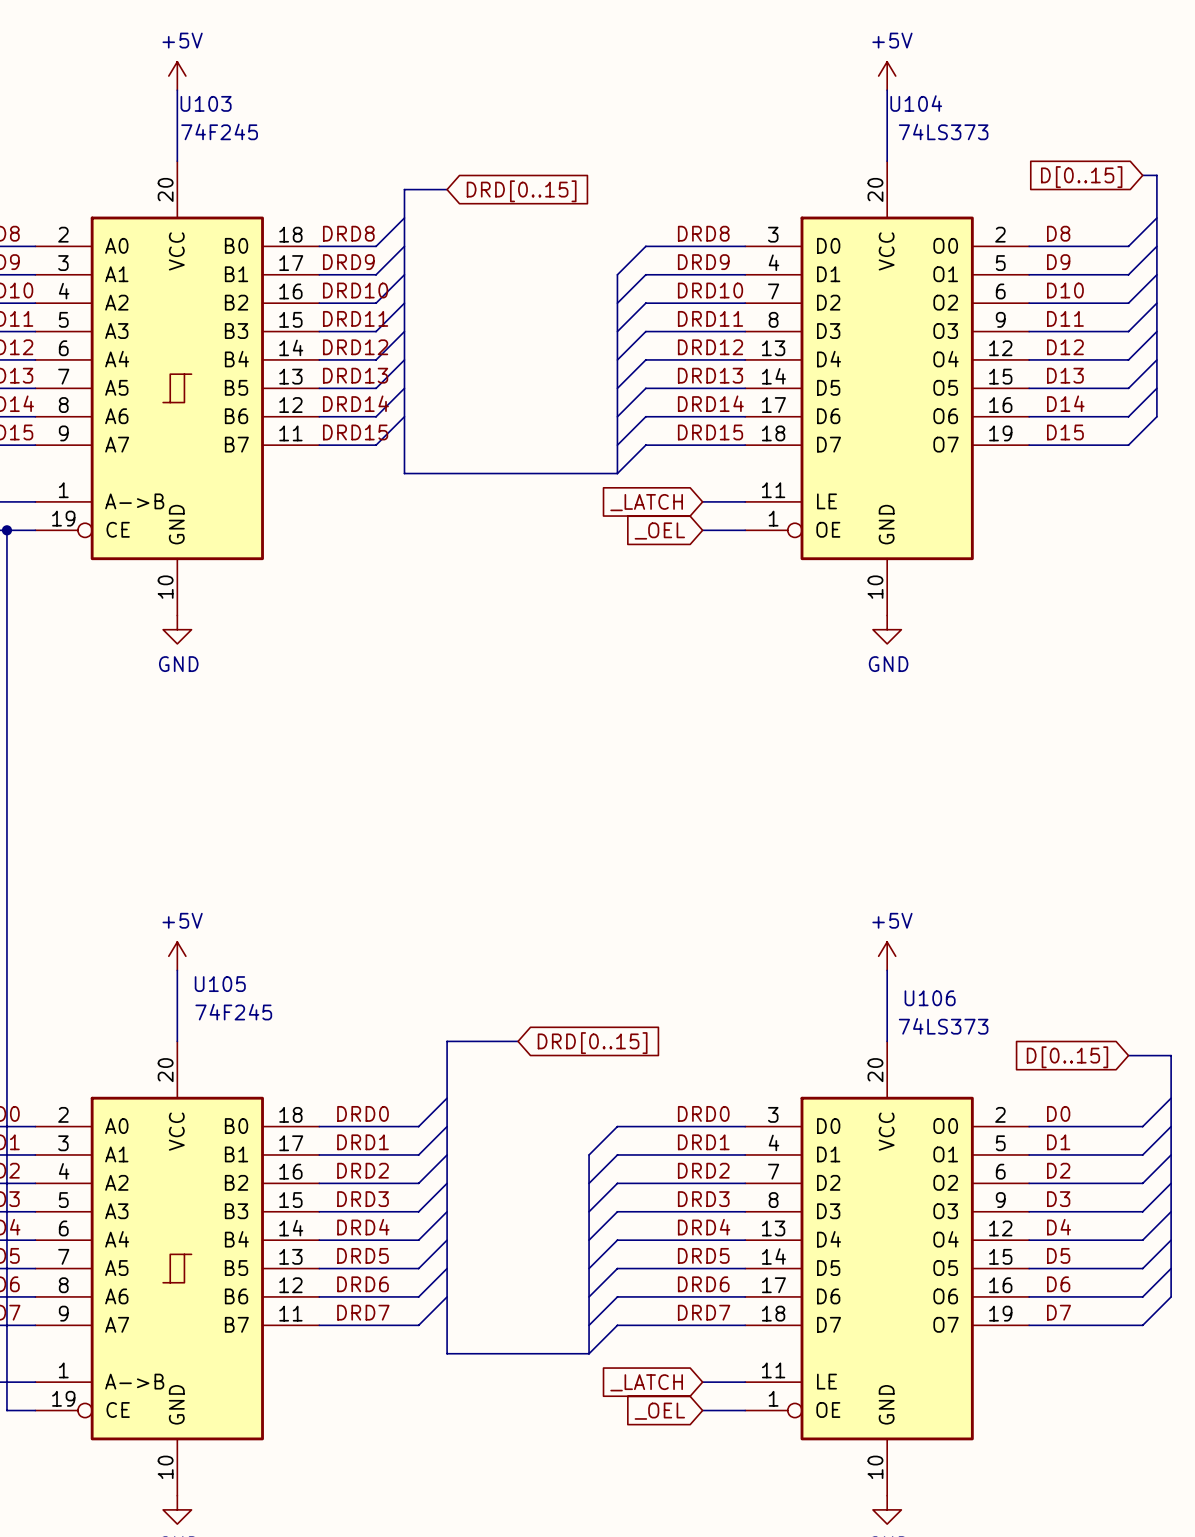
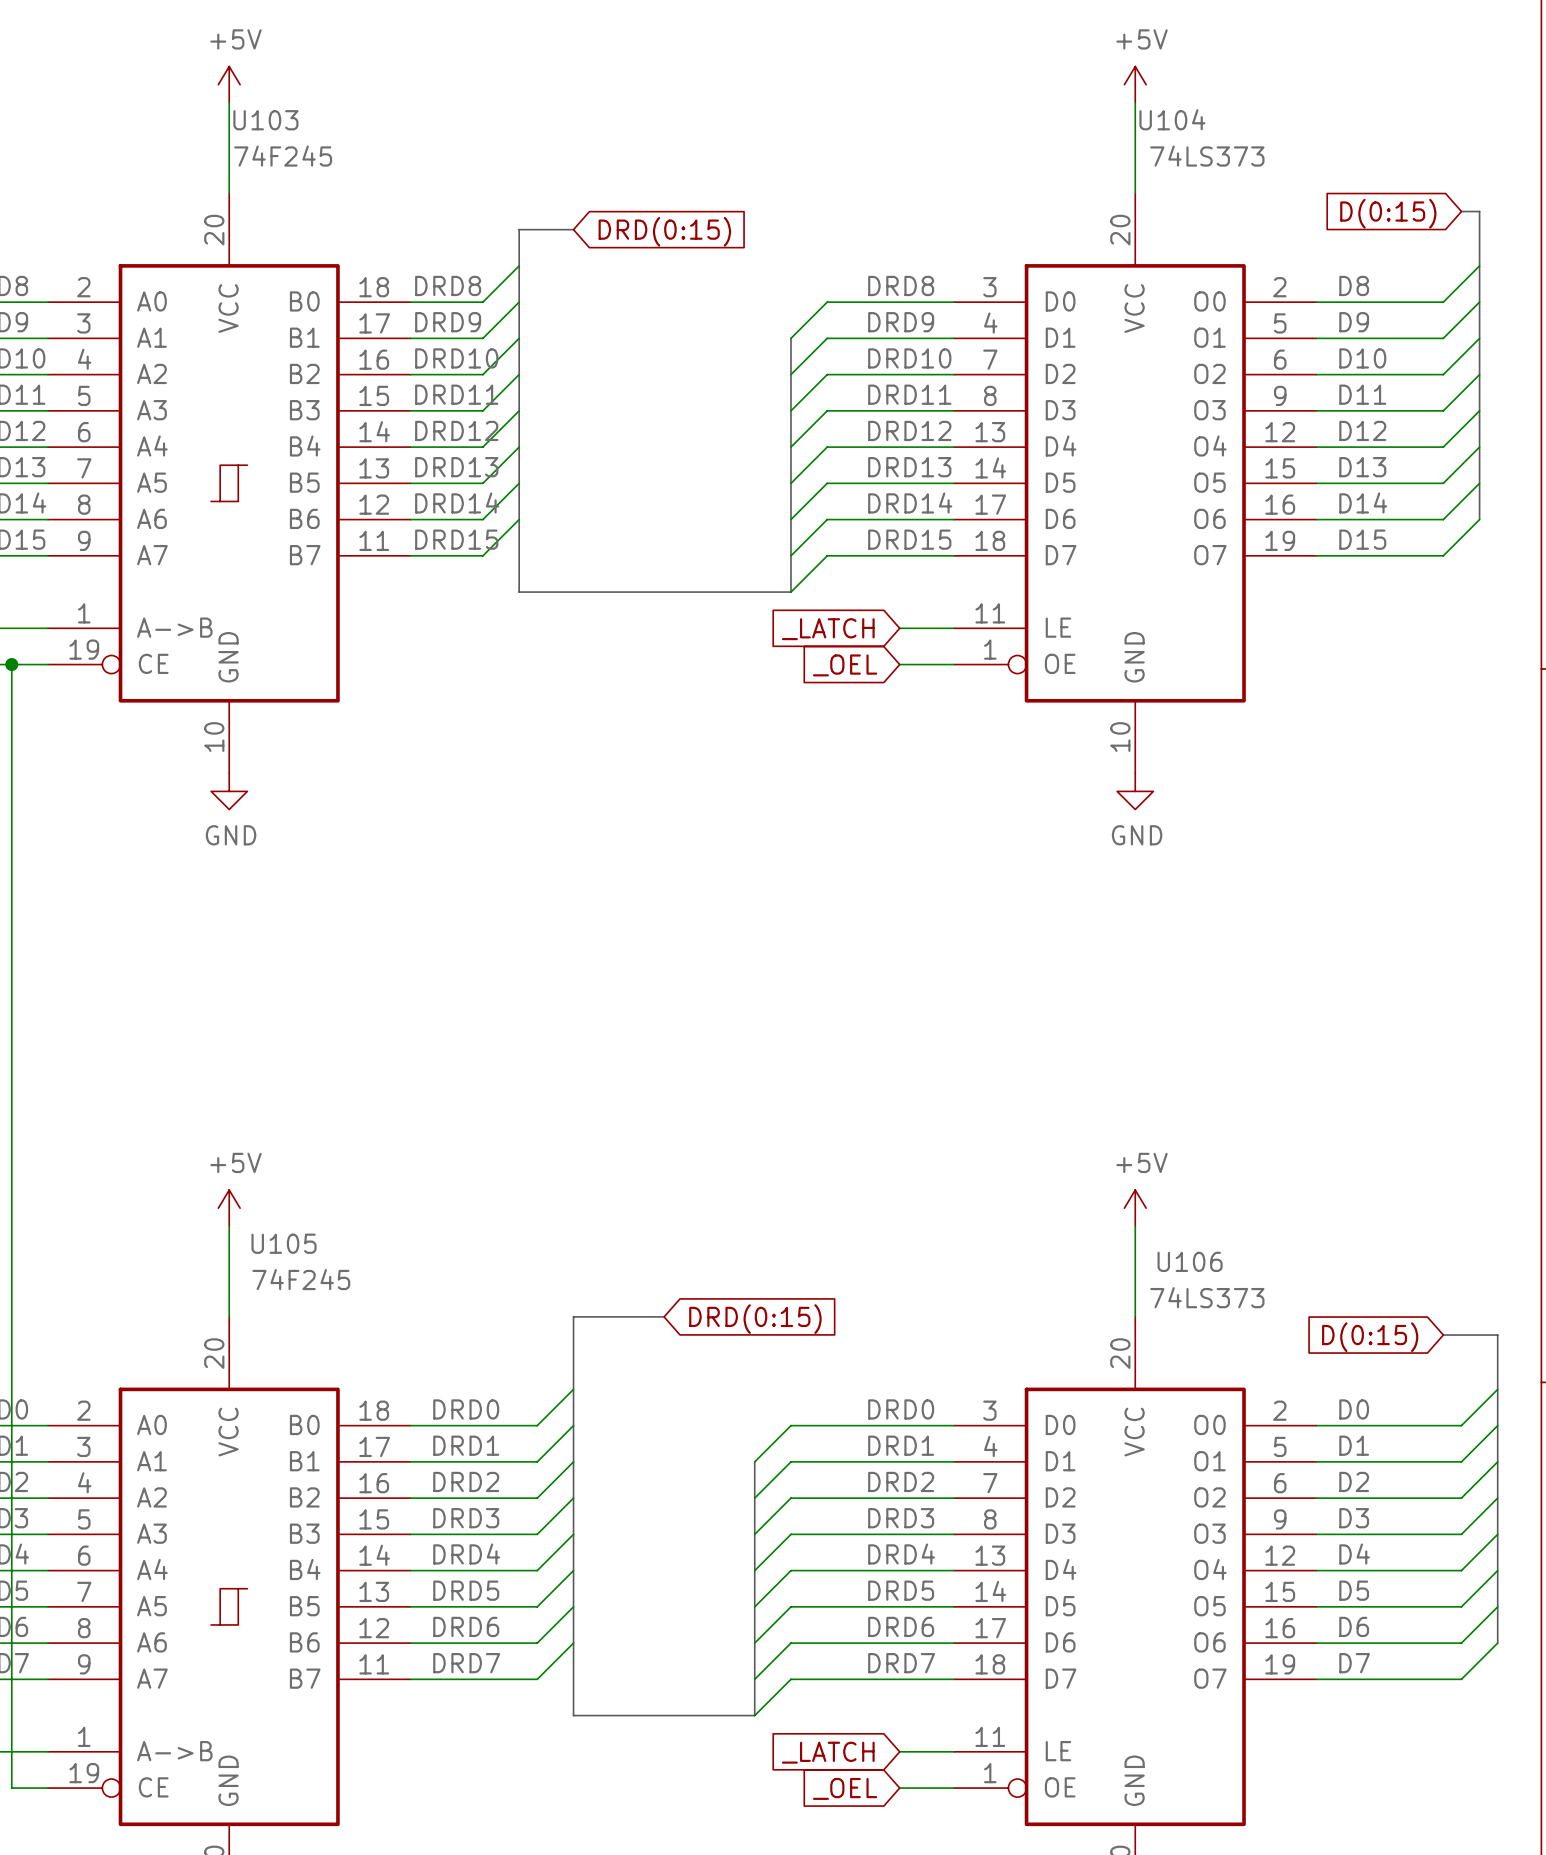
global label: D[0..15] (1081, 177) -> D(0:15) (1388, 213)
global label: DRD[0..15] (521, 191) -> DRD(0:15) (664, 231)
global label: DRD[0..15] (592, 1043) -> DRD(0:15) (755, 1319)
global label: D[0..15] (1067, 1057) -> D(0:15) (1370, 1337)

